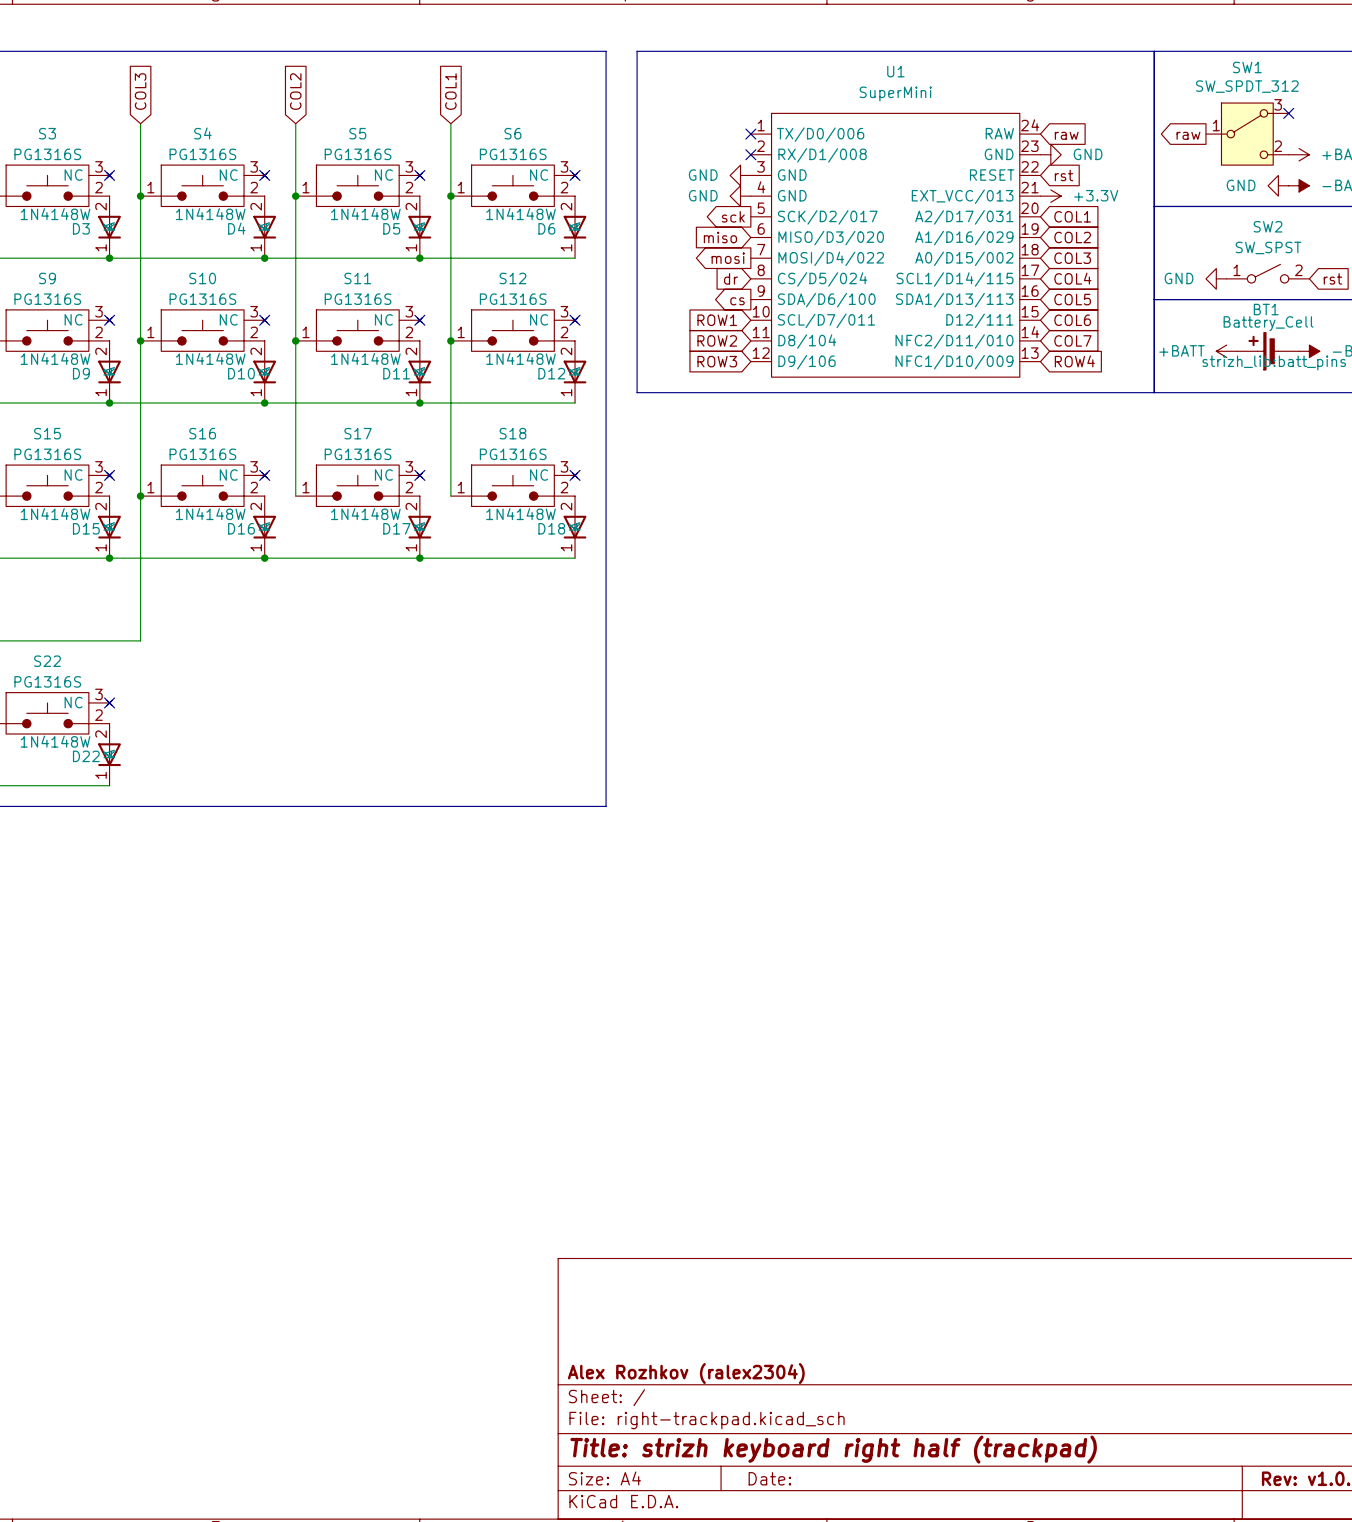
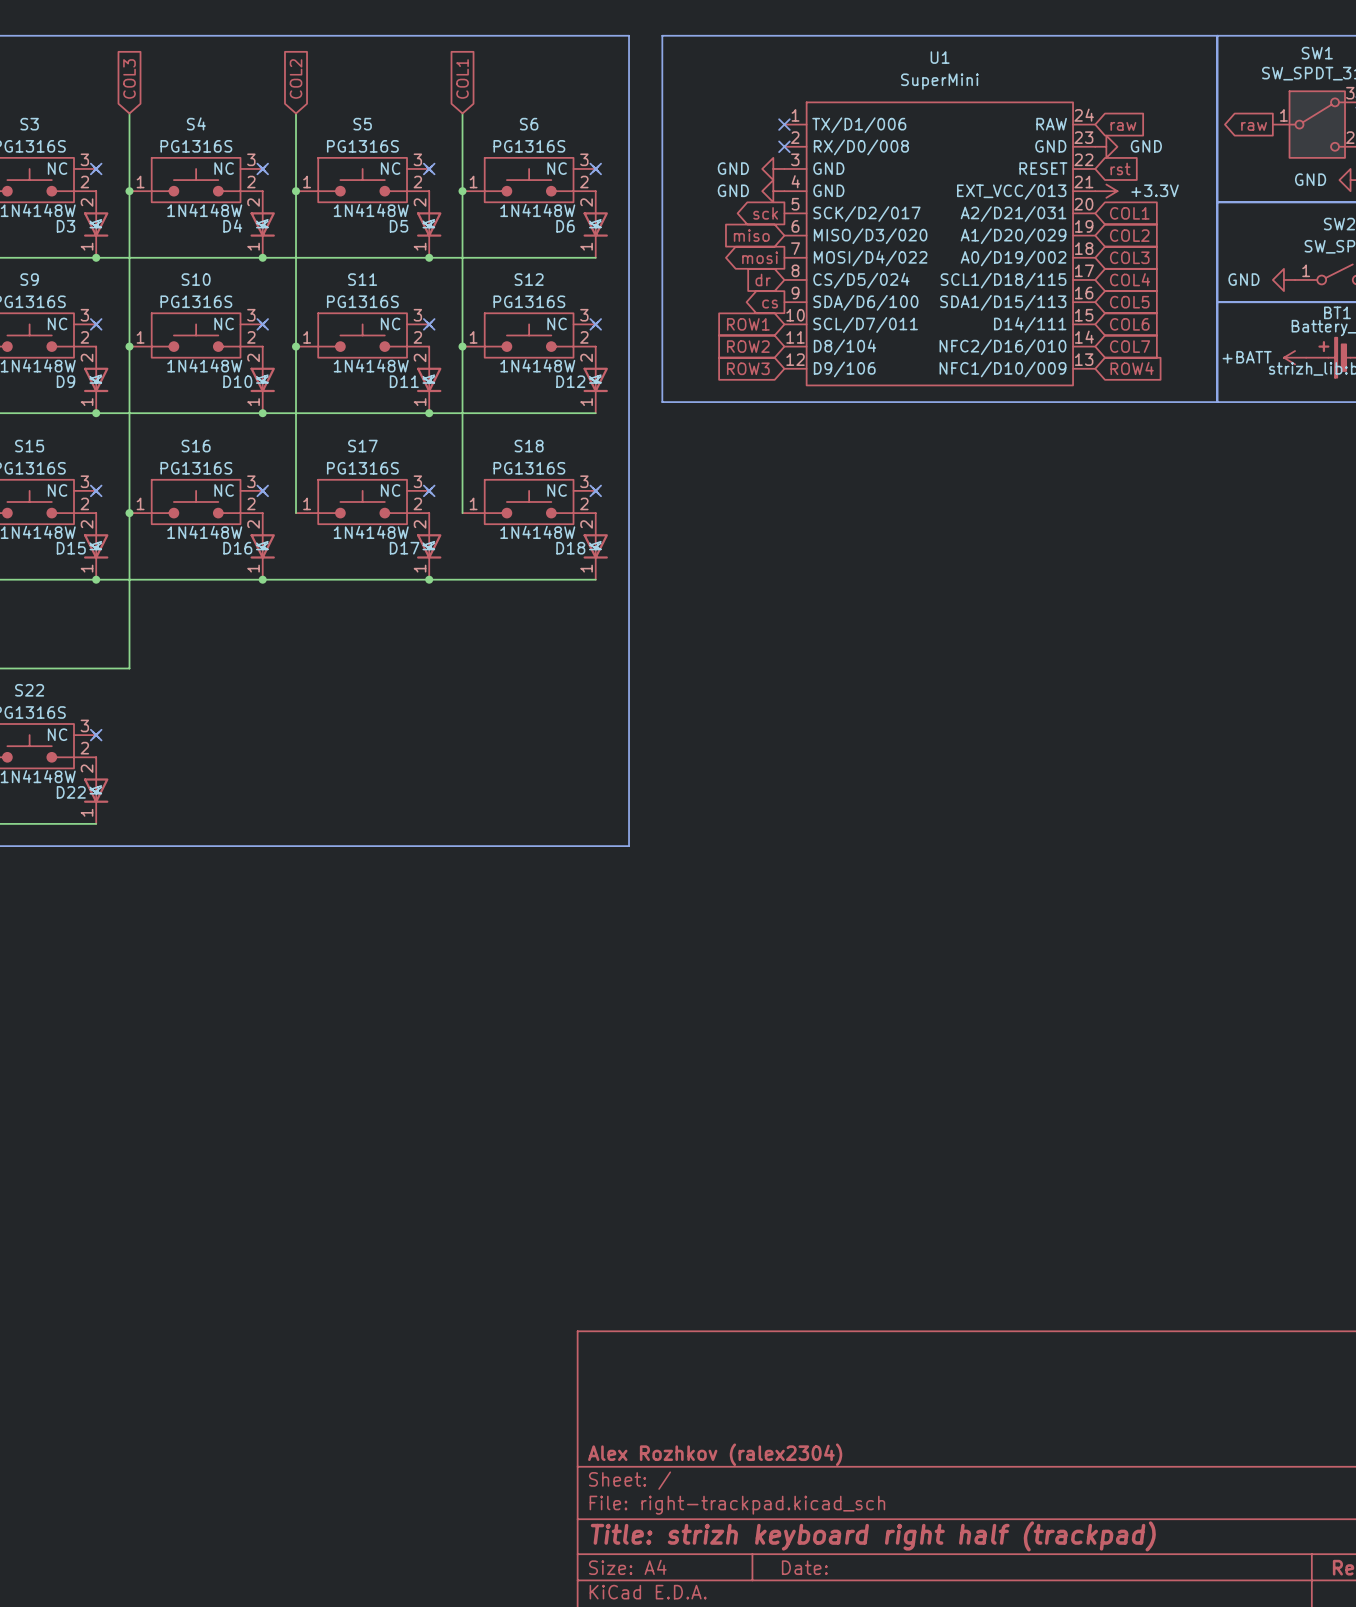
U1 symbol: [750, 113, 1041, 378] -> [784, 102, 1096, 386]

